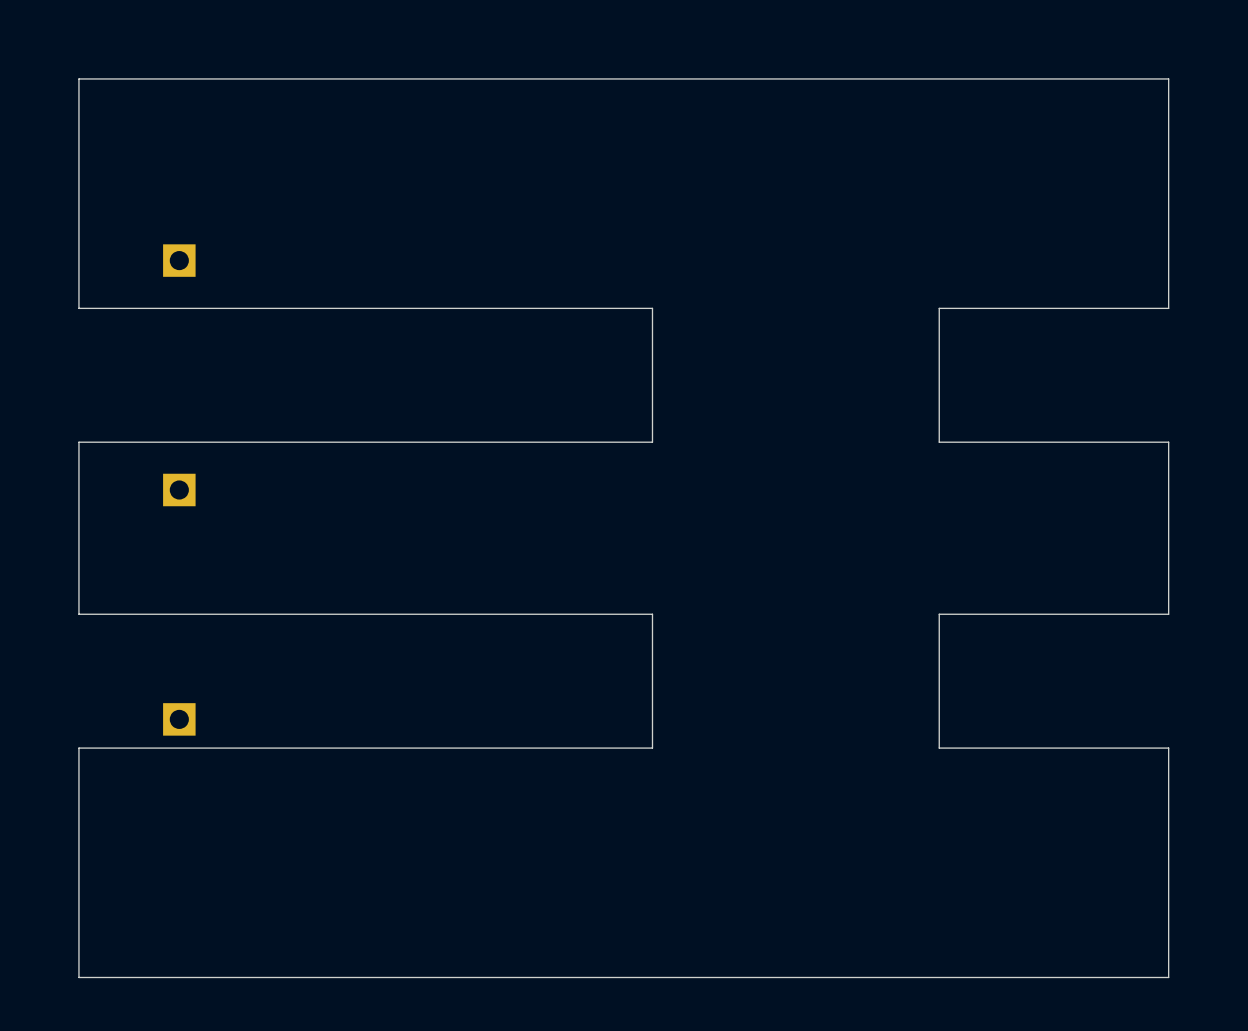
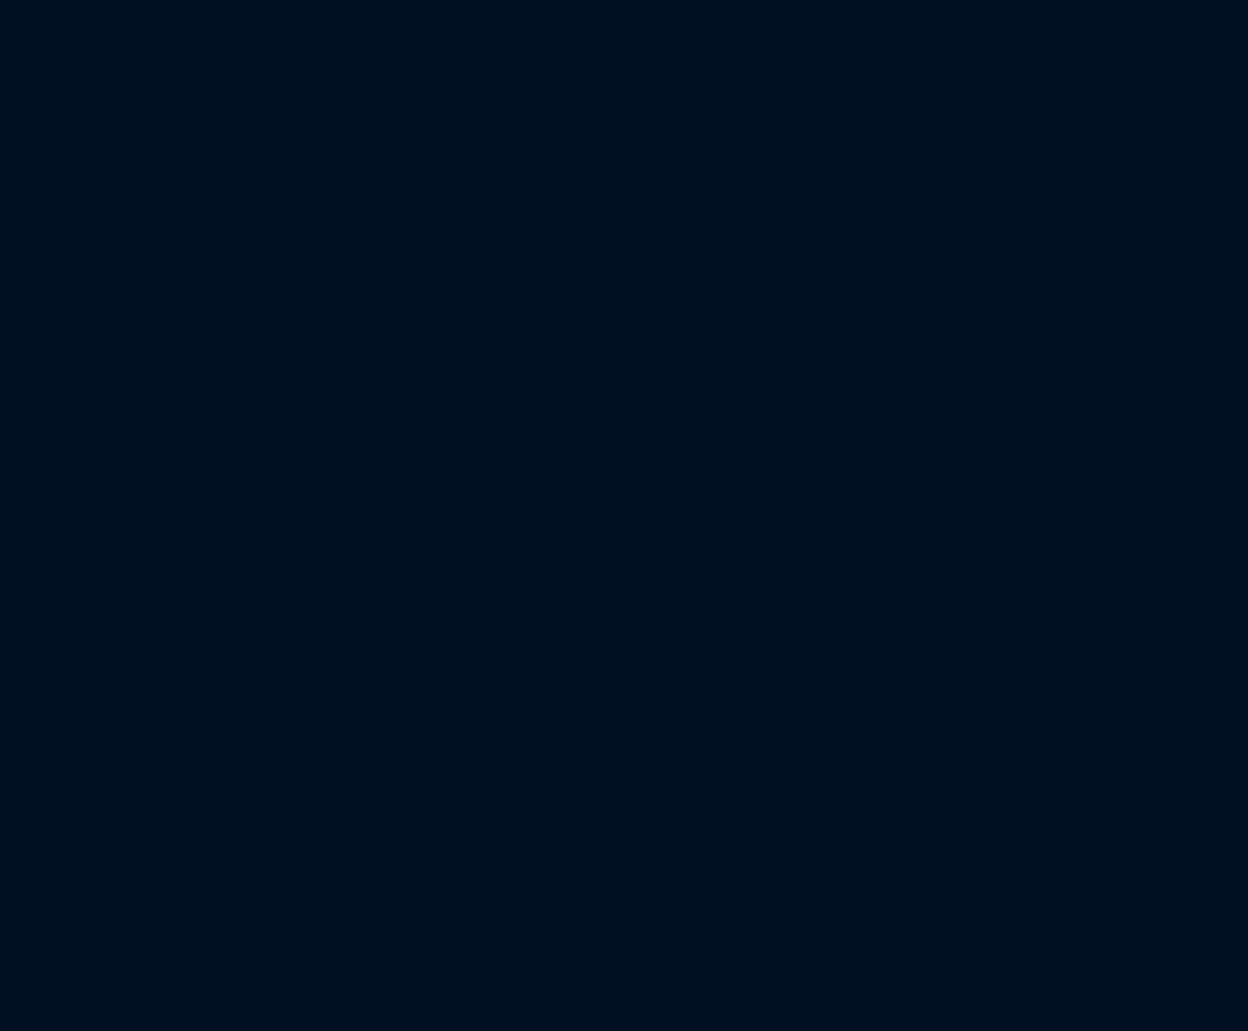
board edge: (1168, 78) (1168, 308) (939, 308) (939, 442) (1168, 442) (1168, 614) (939, 614) (939, 748) (1168, 748) (1168, 977) (78, 977) (78, 748) (652, 748) (652, 614) (78, 614) (78, 442) (652, 442) (652, 308) (78, 308) (78, 78) (1168, 78) -> none
part: (179, 260) -> none
part: (179, 489) -> none
part: (179, 719) -> none

